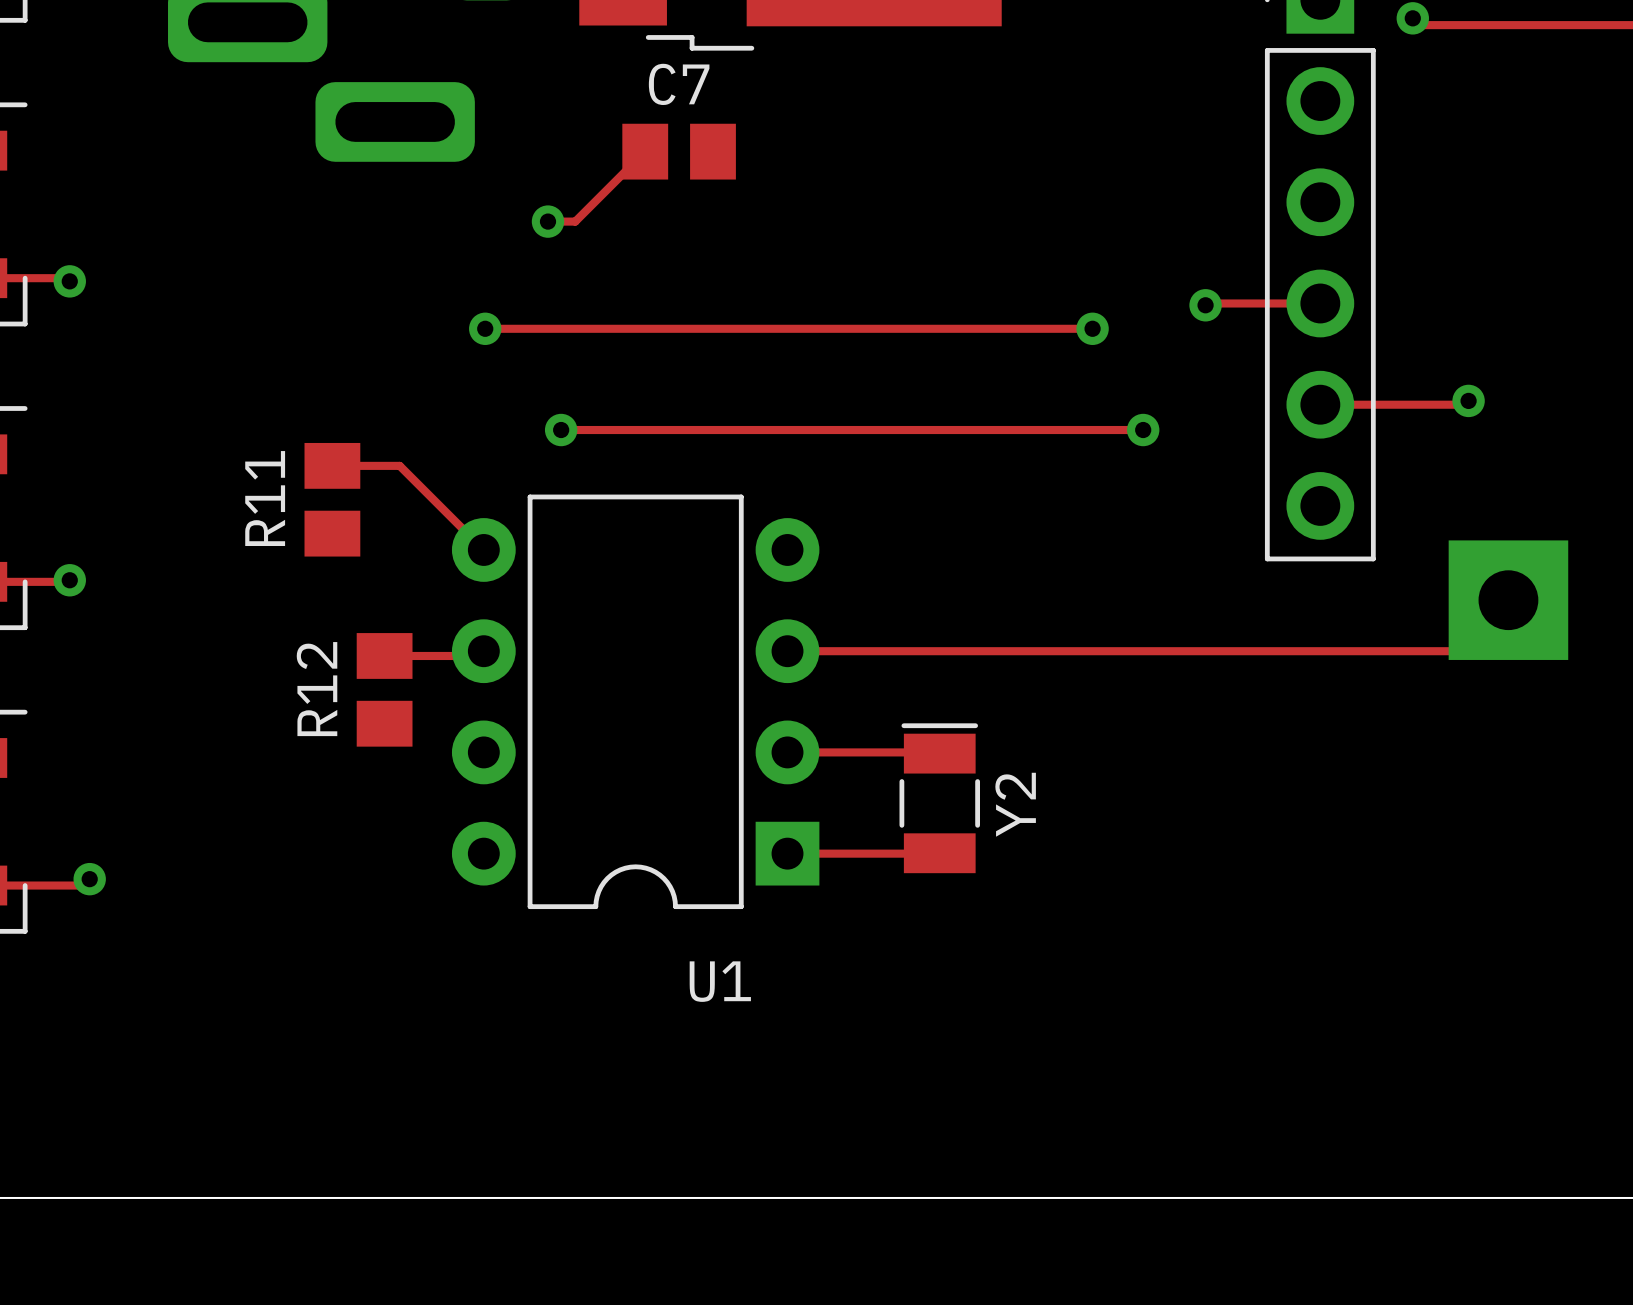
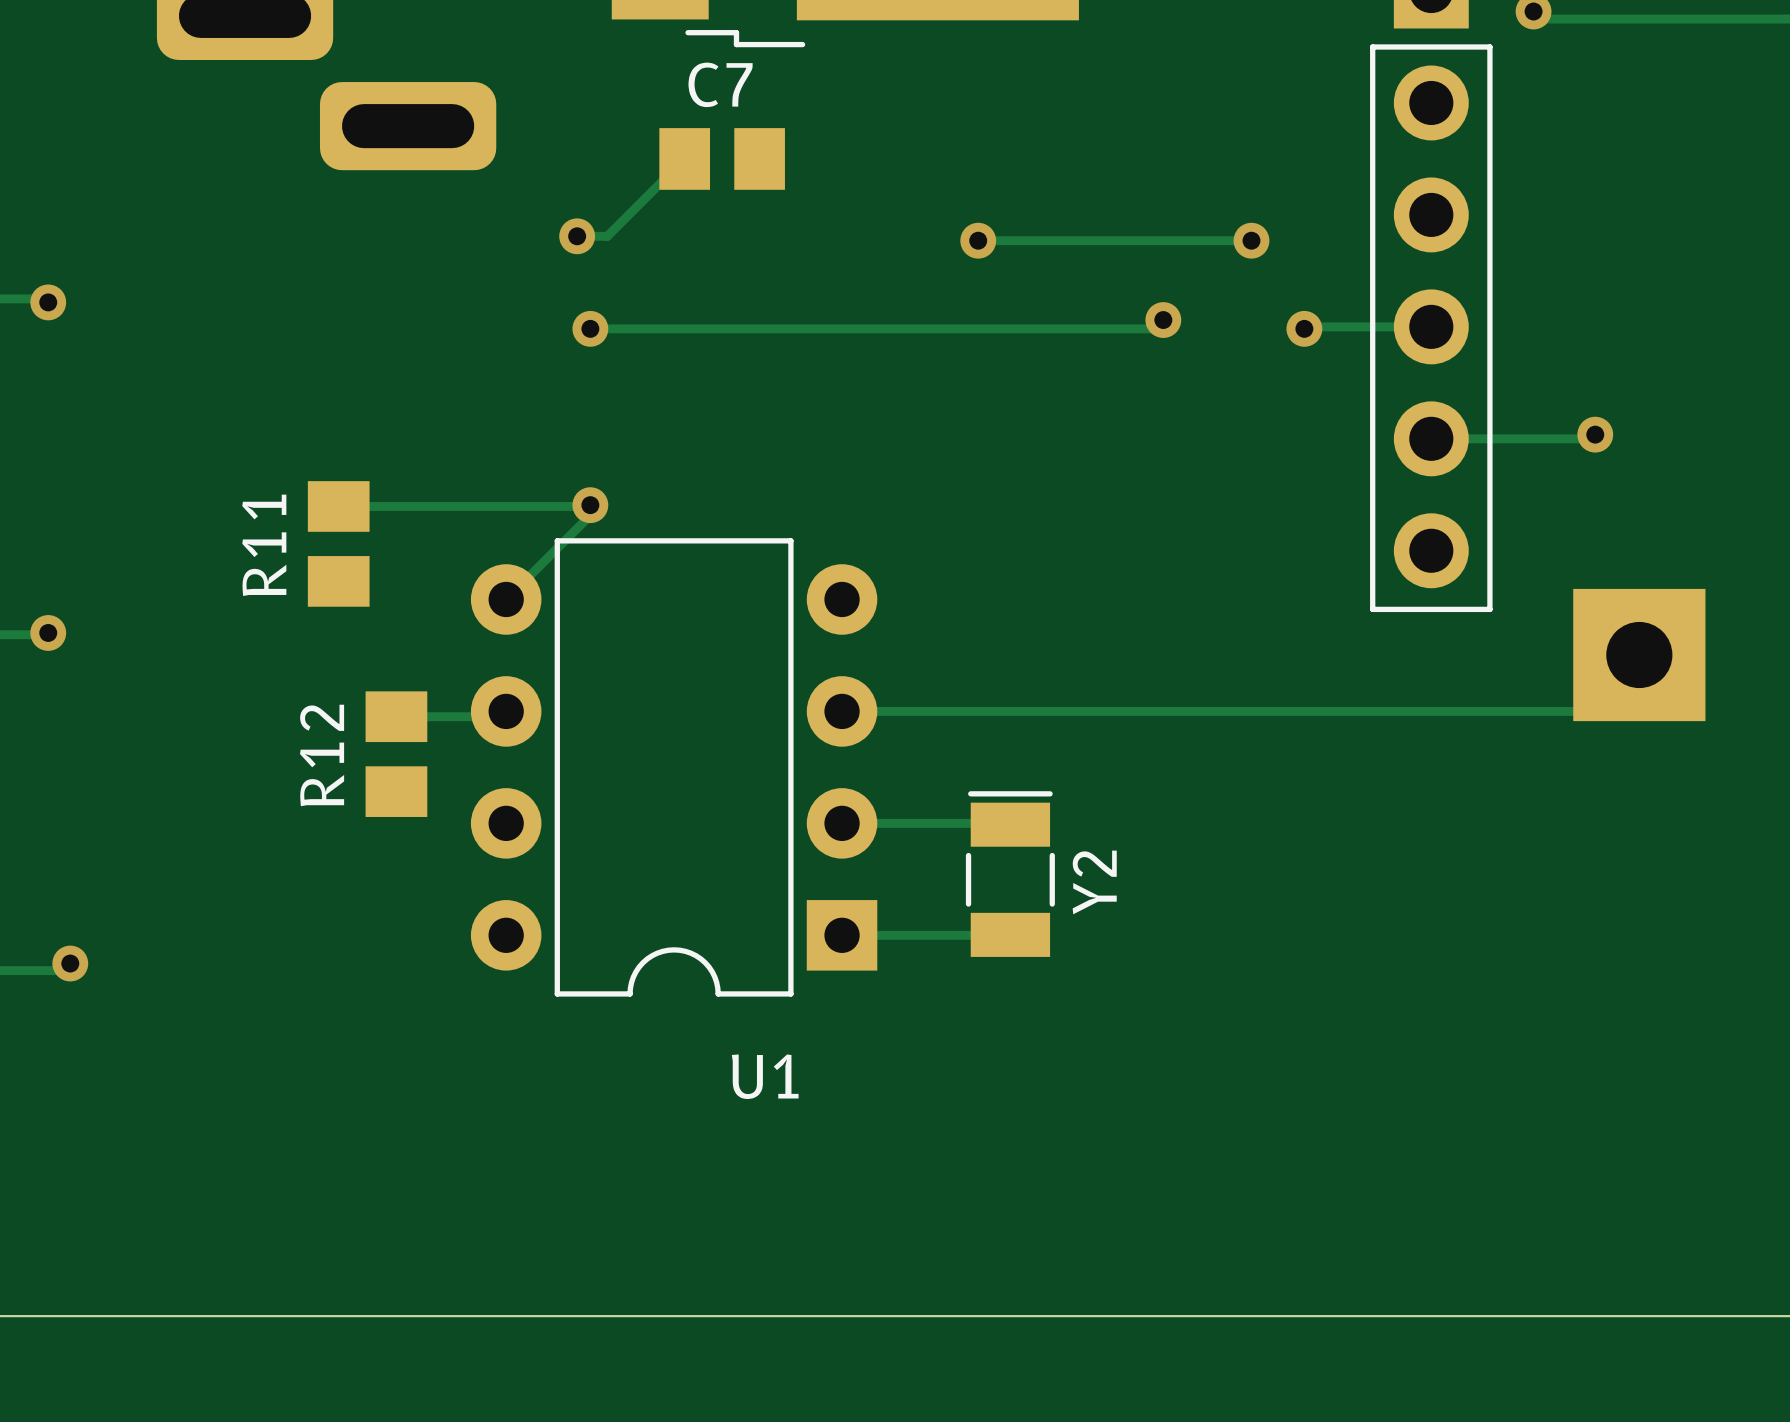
track: none -> (978, 240) (1251, 240)
via: none -> (978, 240)
via: none -> (1251, 240)
track: none -> (1163, 320) (1154, 328) (590, 328)
via: none -> (590, 328)
track: (485, 328) (1092, 328) -> none
via: (485, 328) -> none
via position: (1092, 328) -> (1163, 320)
track: (561, 430) (1143, 430) -> none
via position: (561, 430) -> (590, 505)
via: (1143, 430) -> none
track: (399, 465) (483, 549) -> (413, 506) (590, 505) (590, 515) (506, 599)

